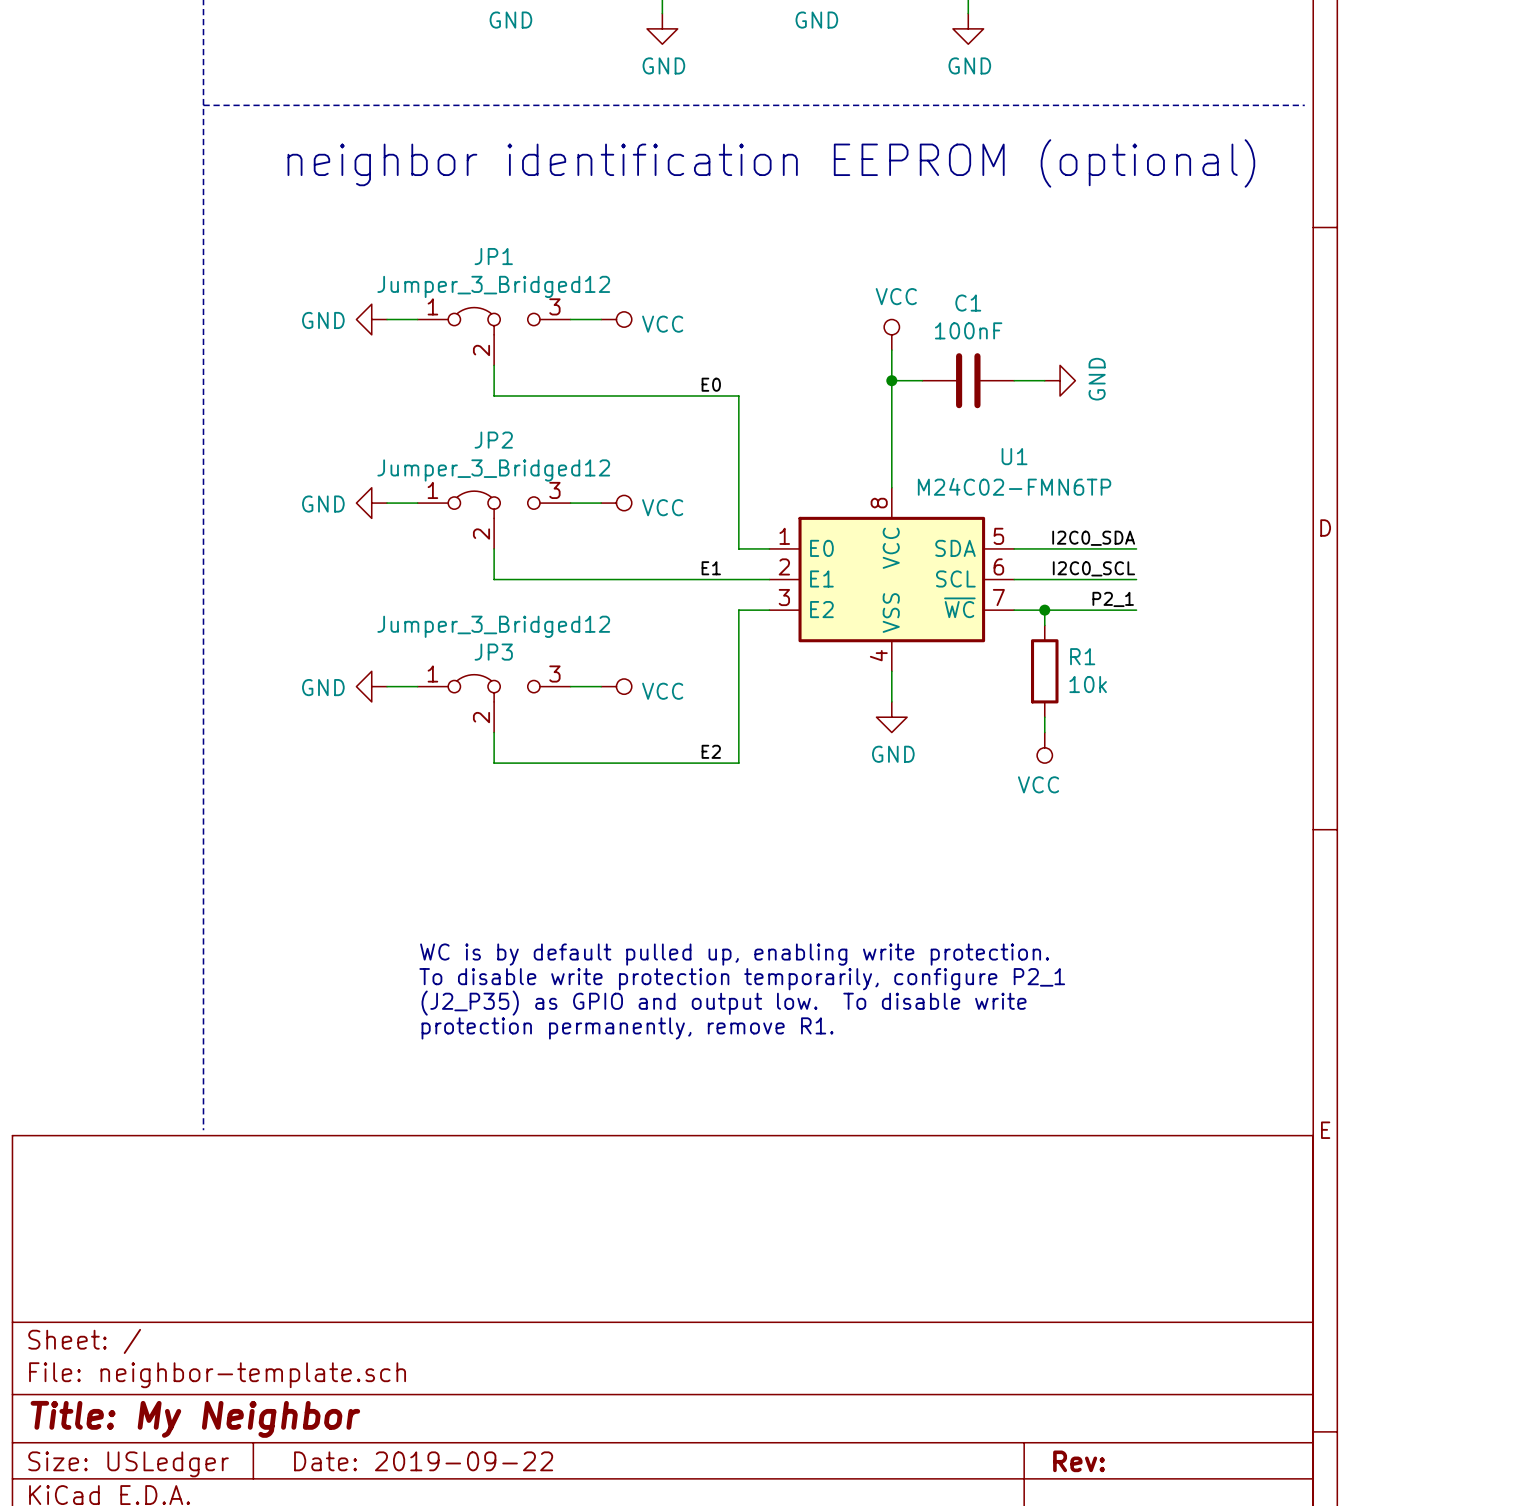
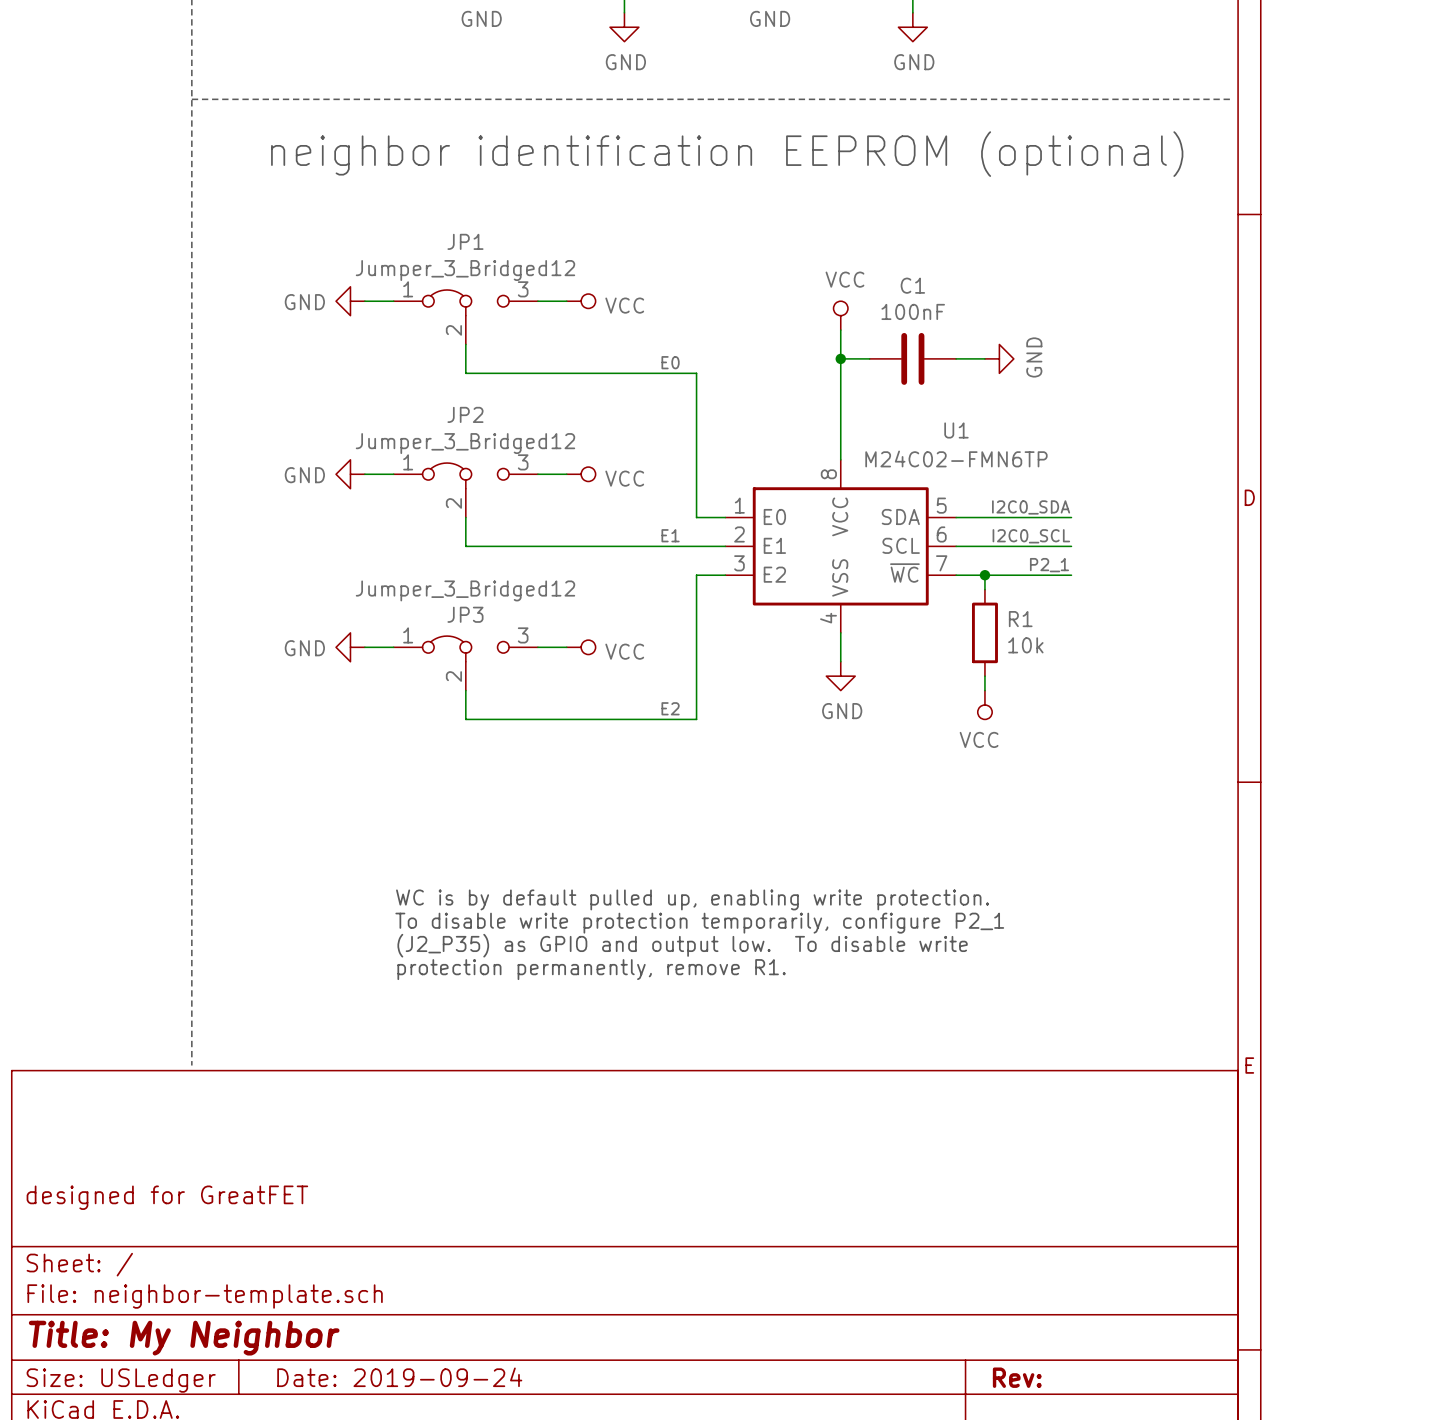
title block: none -> designed for GreatFET (167, 1197)
title block: Date: 2019-09-22 (423, 1461) -> Date: 2019-09-24 (399, 1377)

